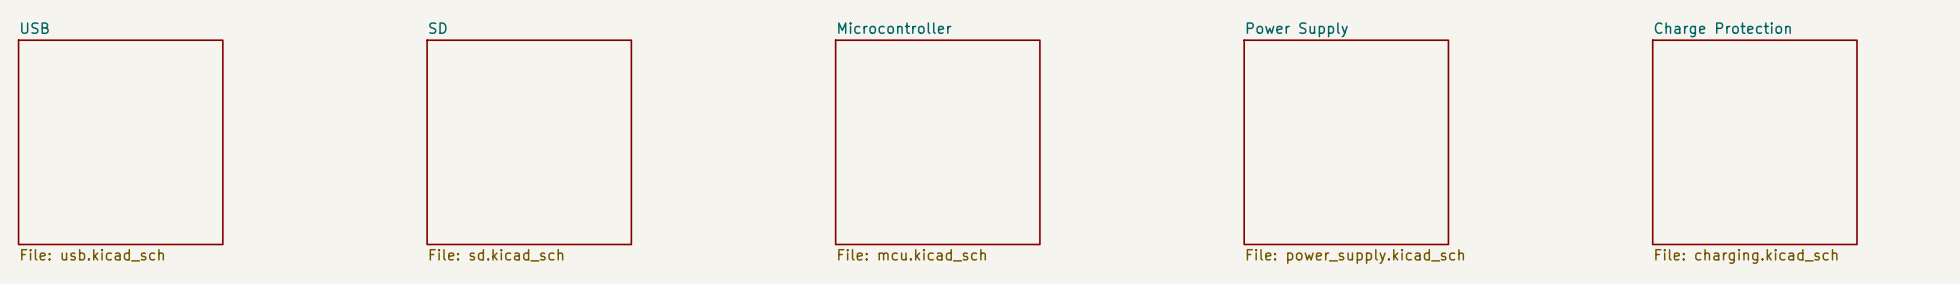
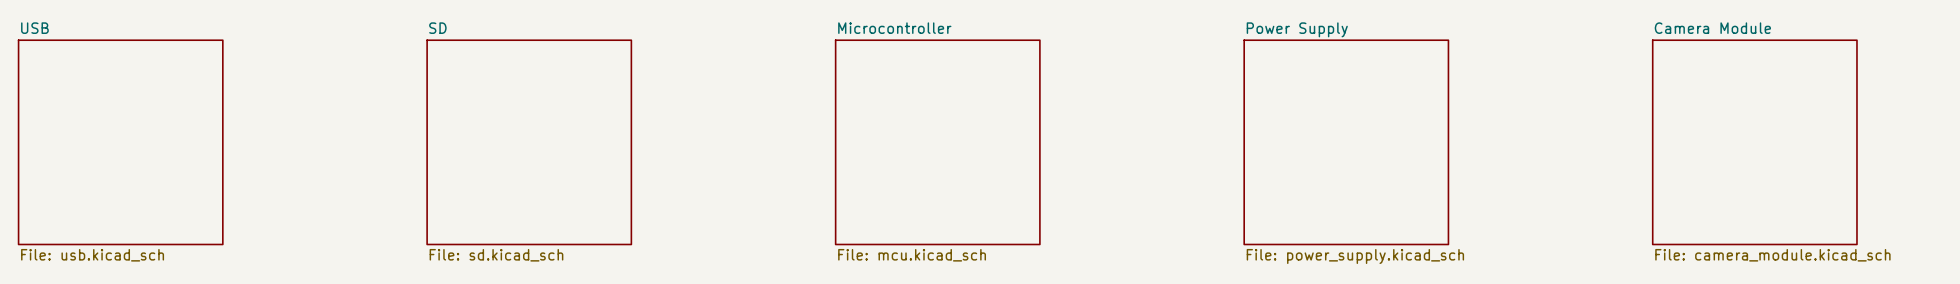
sheet Charge Protection name: Charge Protection (1722, 29) -> Camera Module (1712, 28)
sheet Charge Protection value: File: charging.kicad_sch (1746, 256) -> File: camera_module.kicad_sch (1772, 255)

